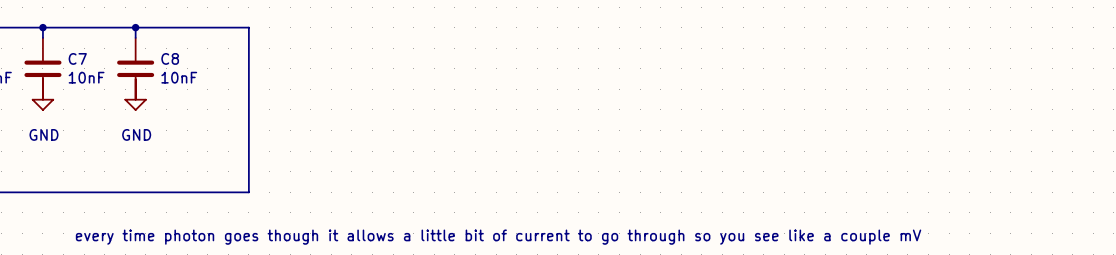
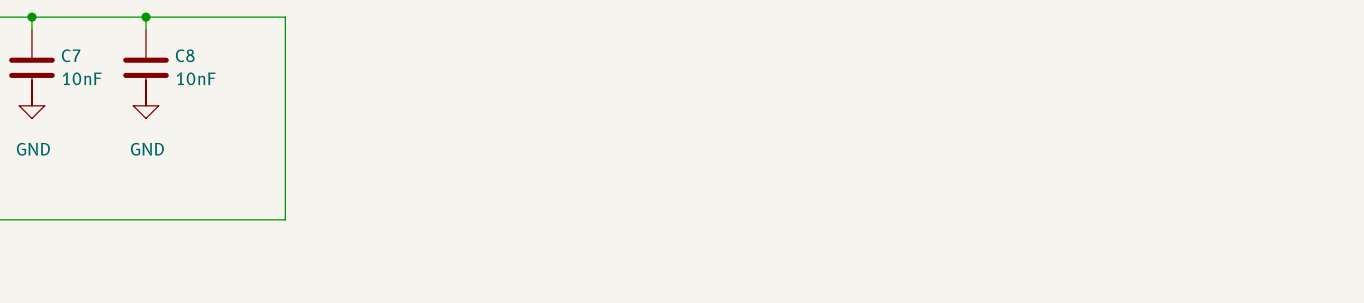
text: every time photon goes though it allows a little bit of current to go through so you see like a couple mV (498, 237) -> none

